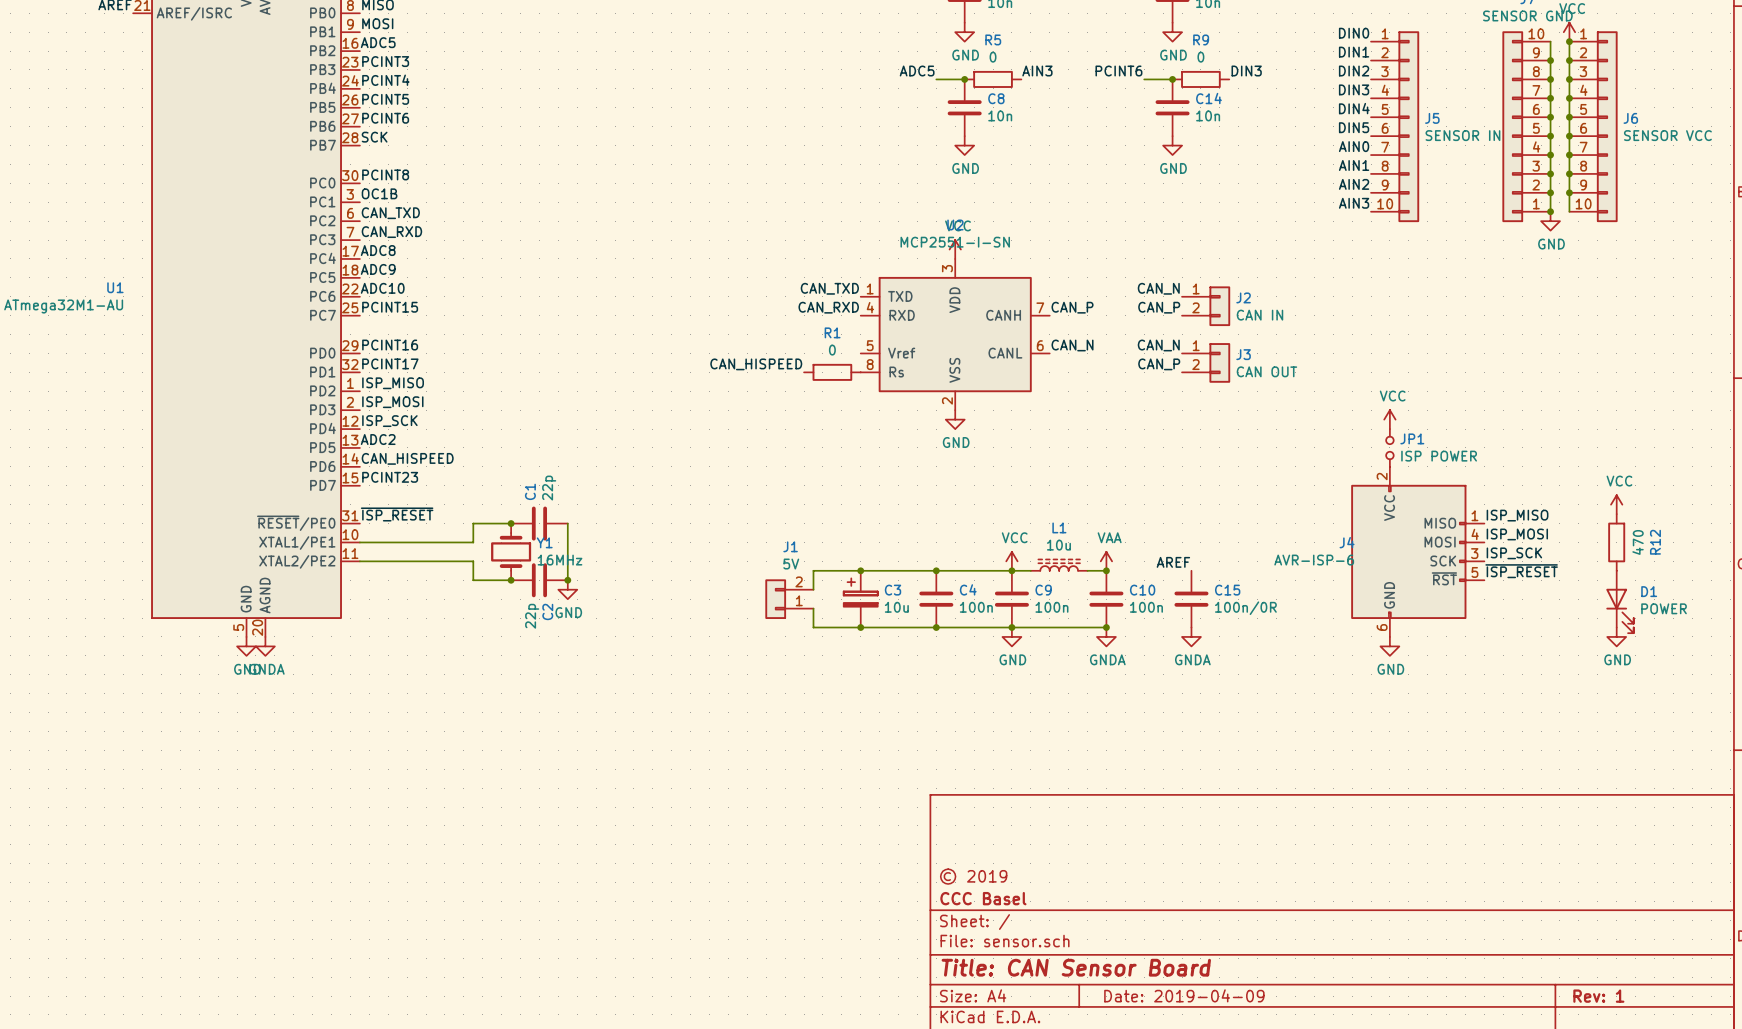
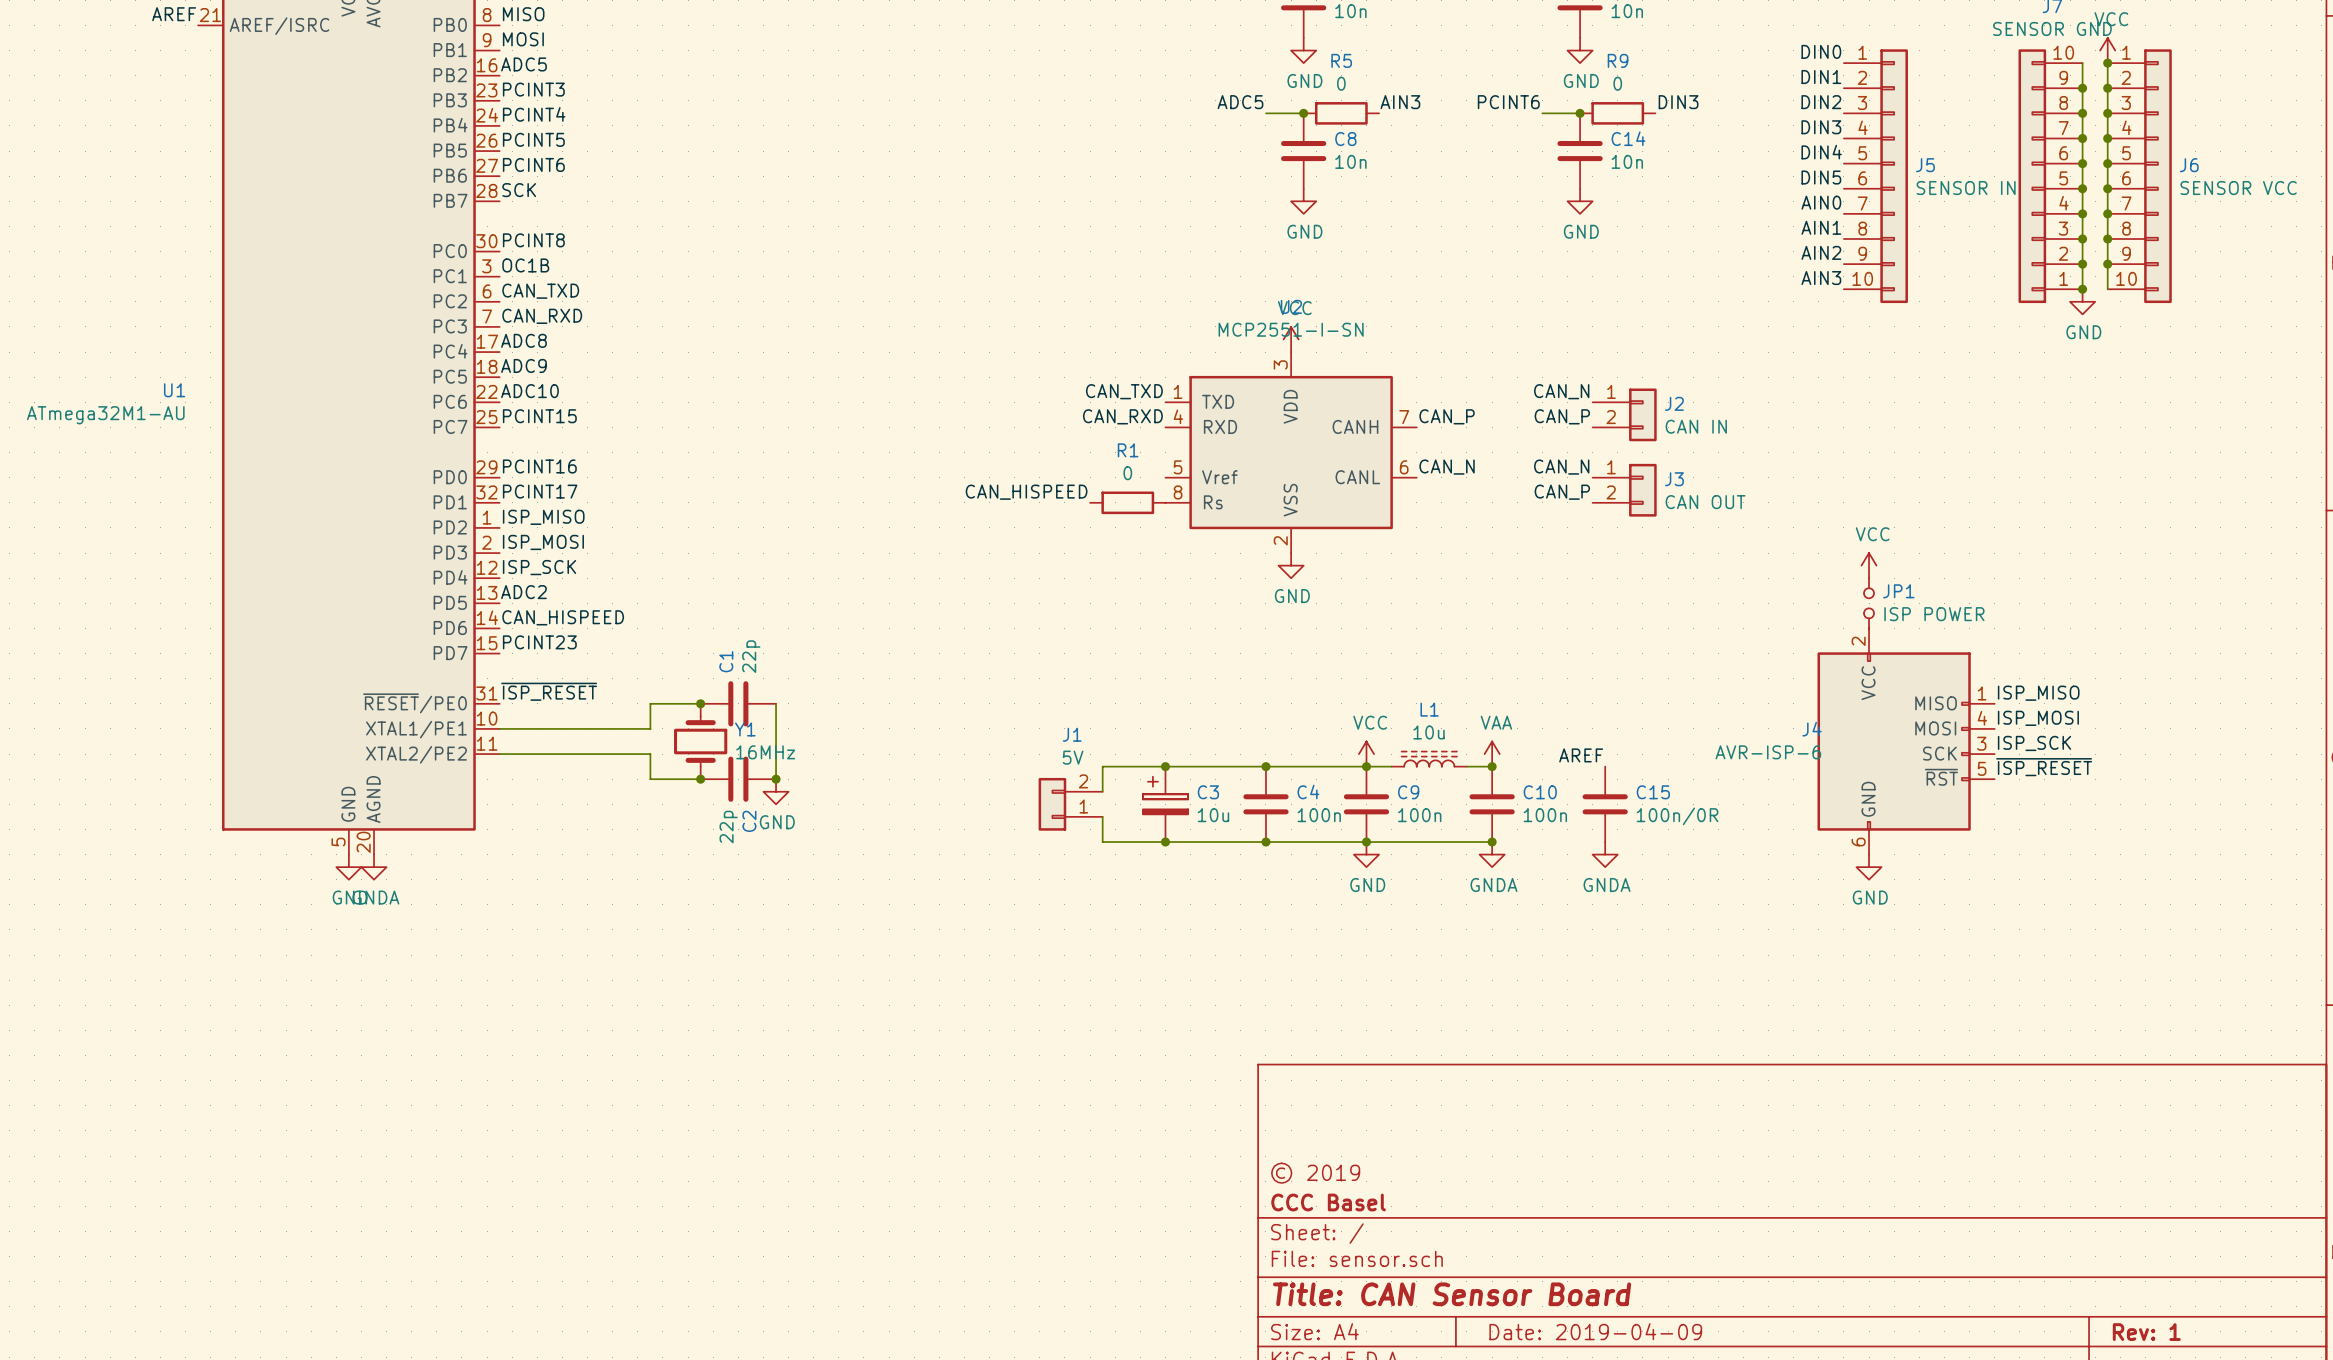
power symbol: VCC (1616, 504) -> none
R12: 470 (1616, 542) -> none
D1: POWER (1620, 601) -> none
power symbol: GND (1616, 636) -> none

